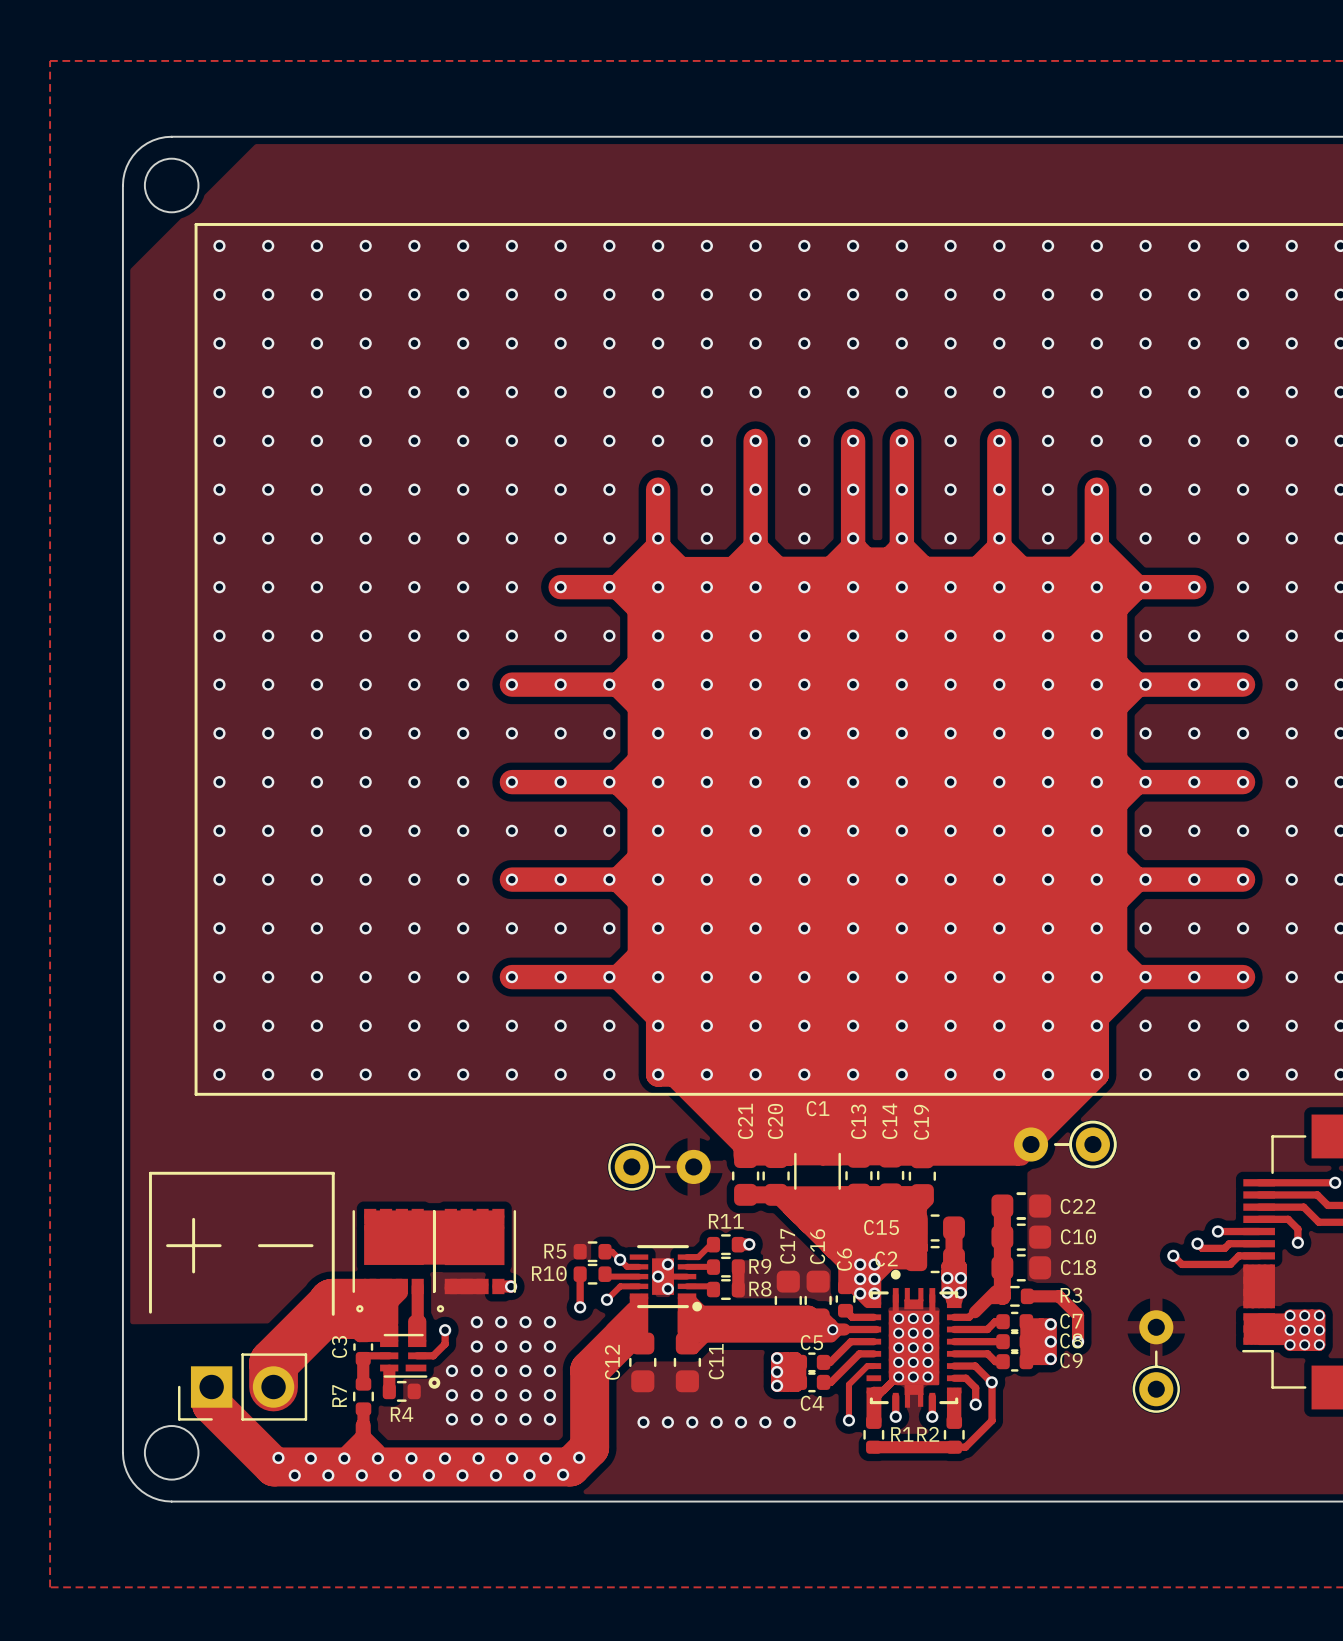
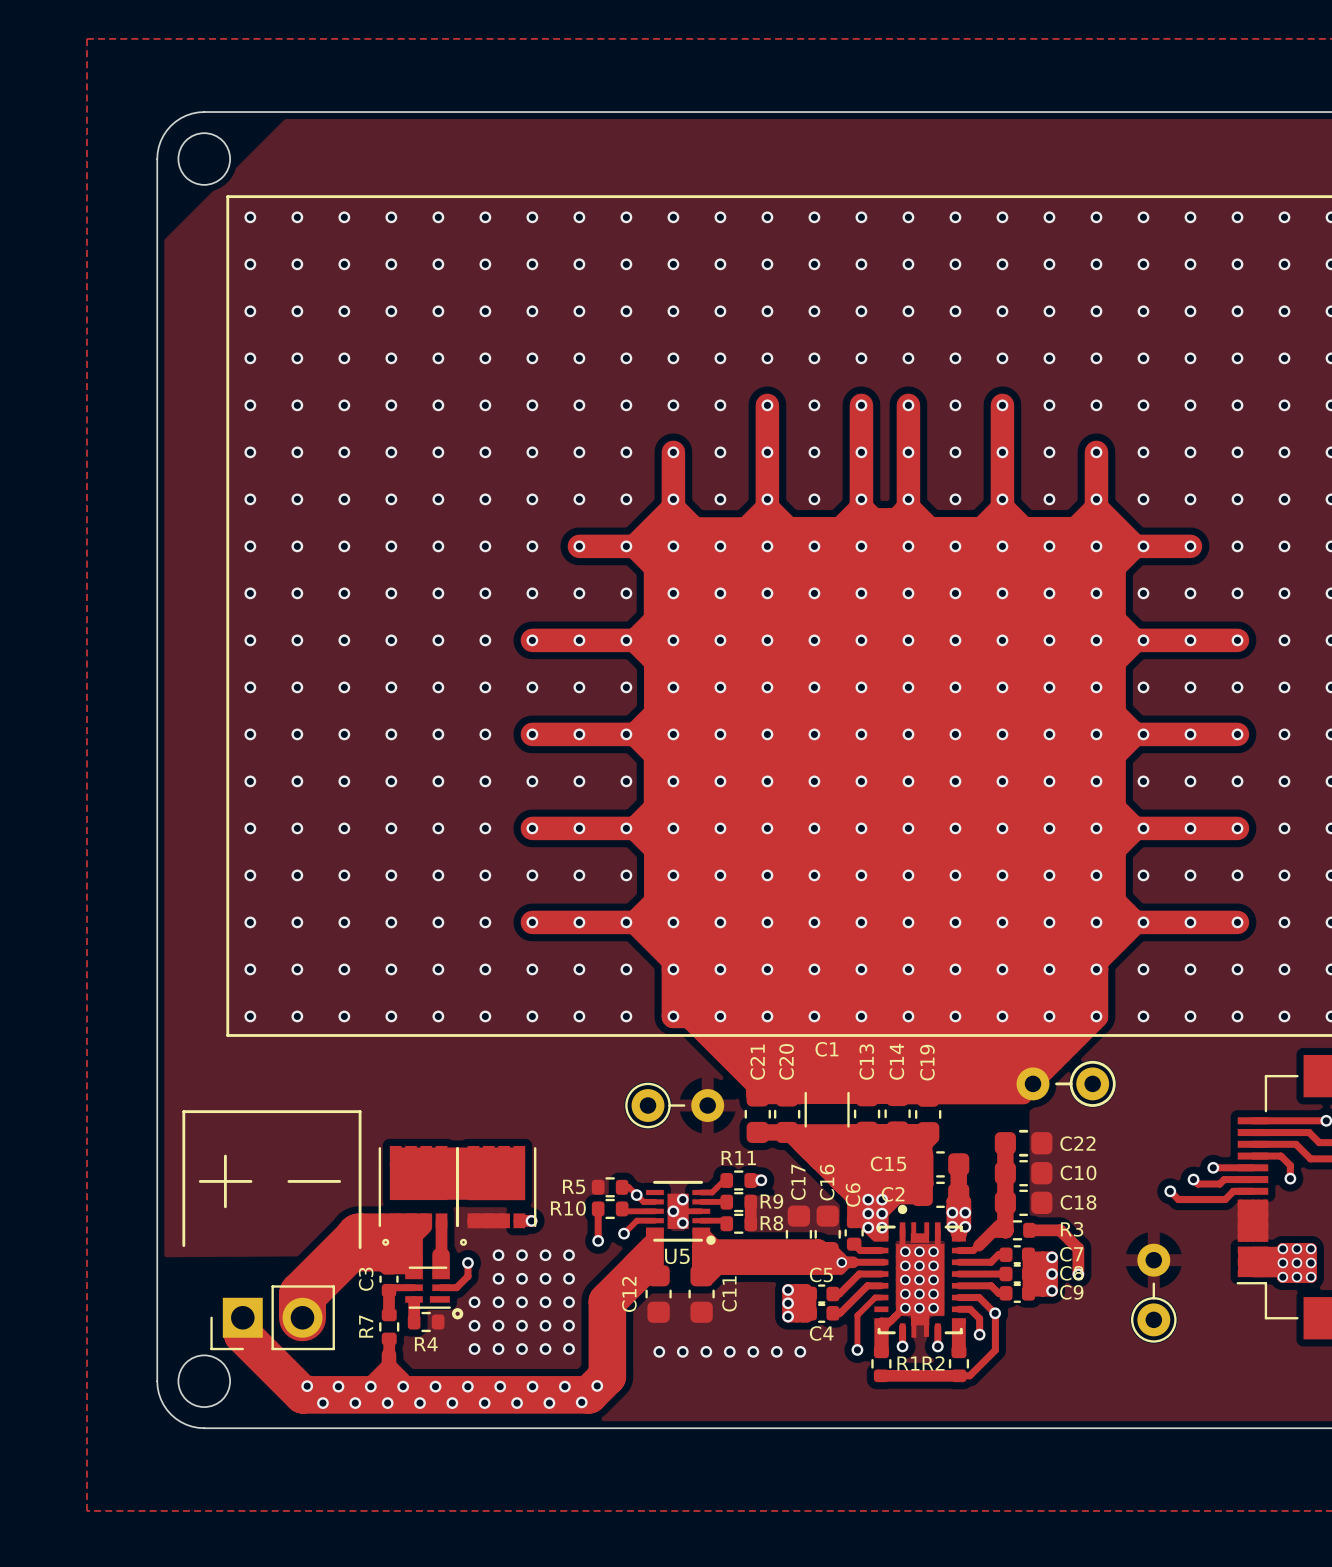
U5 name: none -> U5 (677, 1256)

